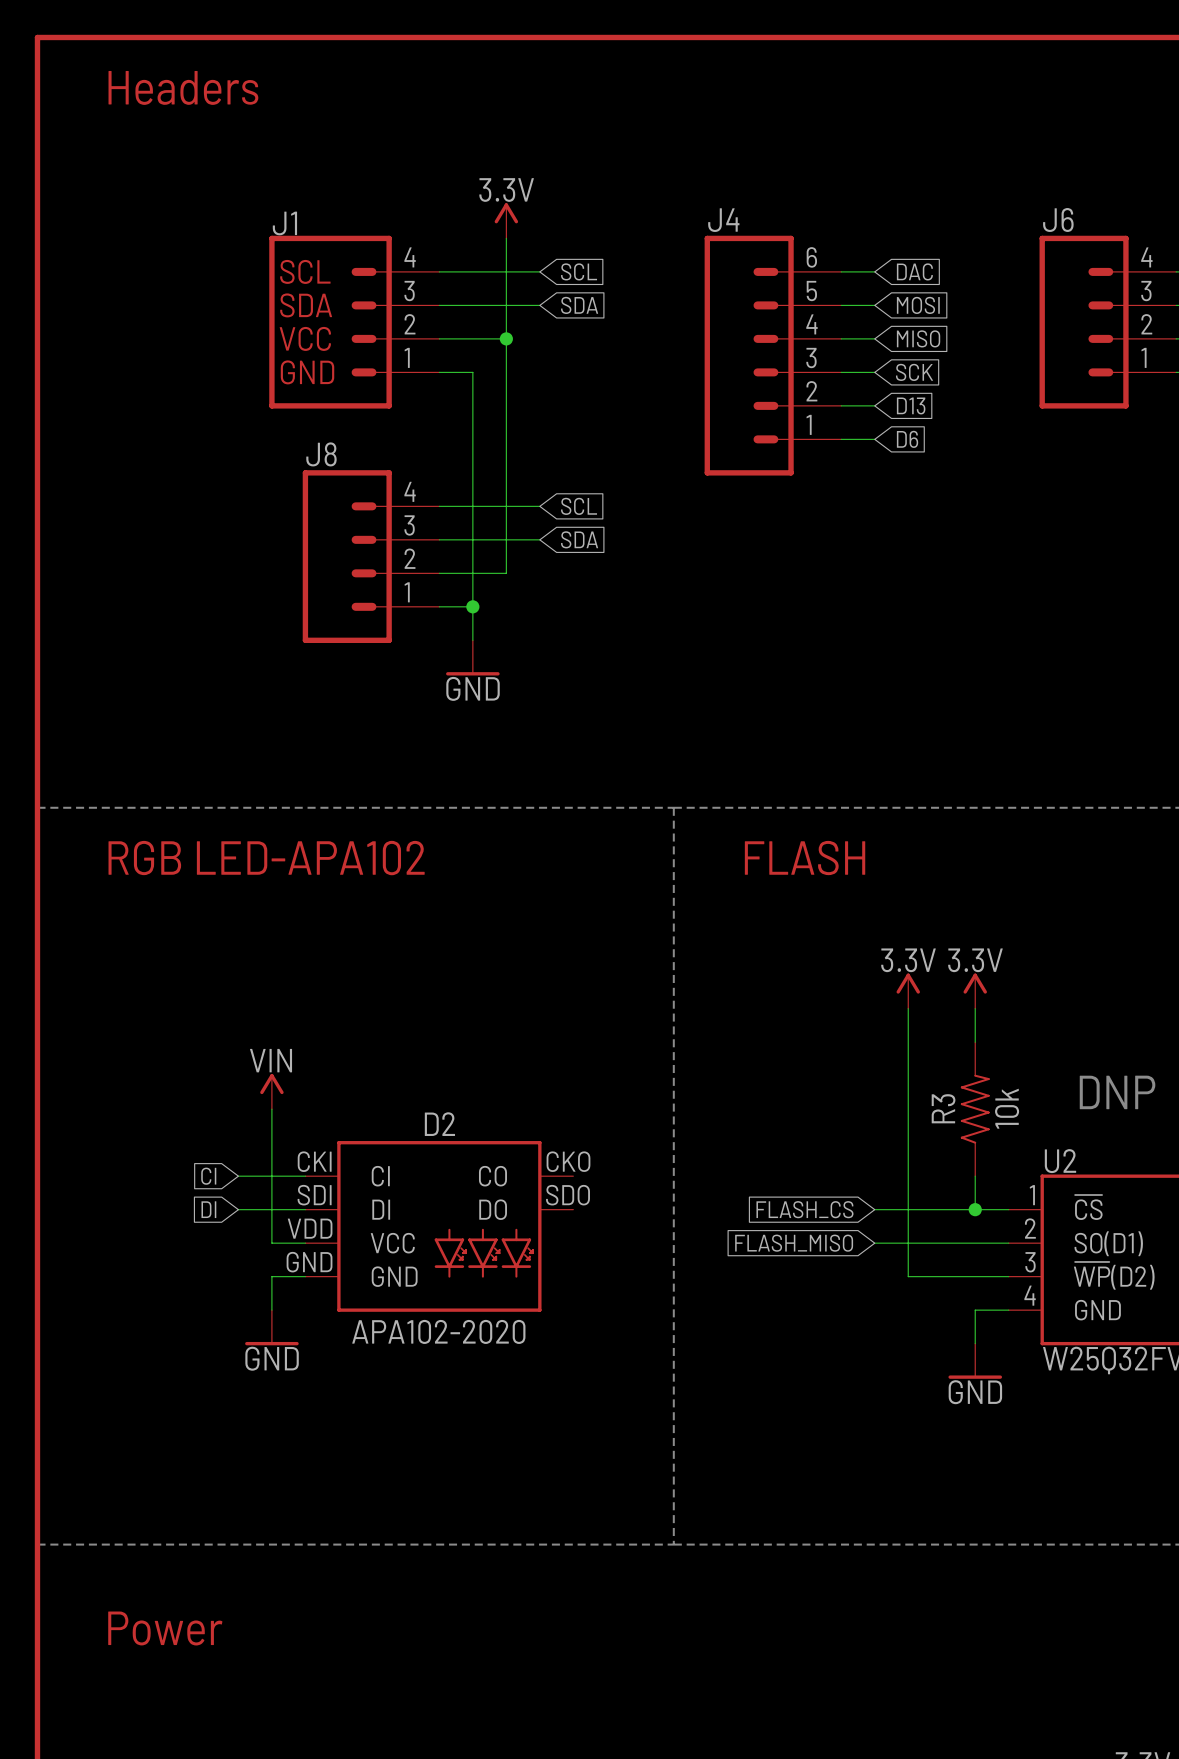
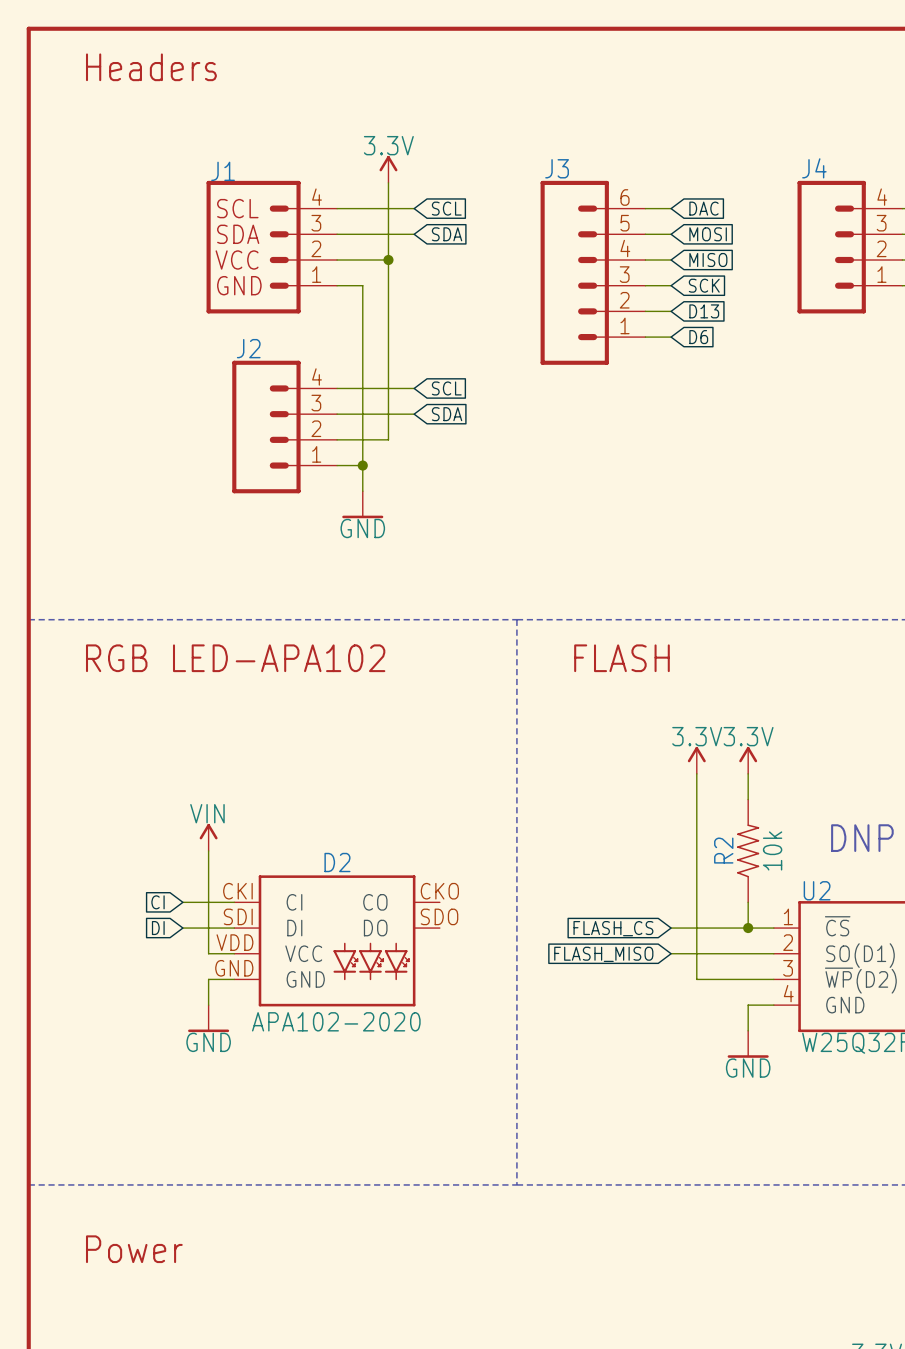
J4 name: J4 (723, 220) -> J3 (557, 168)
J6 name: J6 (1058, 220) -> J4 (814, 168)
J8 name: J8 (321, 454) -> J2 (248, 348)
R3 name: R3 (943, 1108) -> R2 (723, 850)

